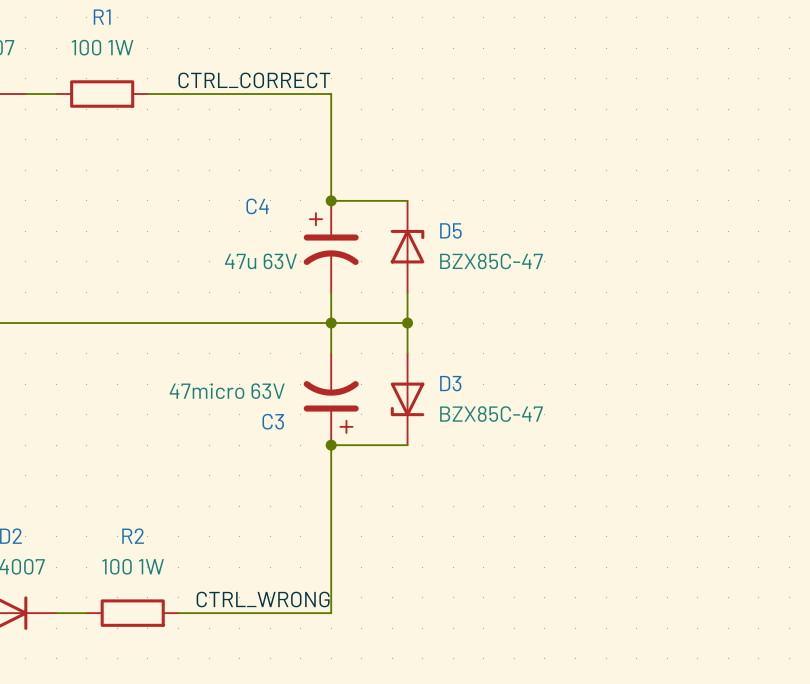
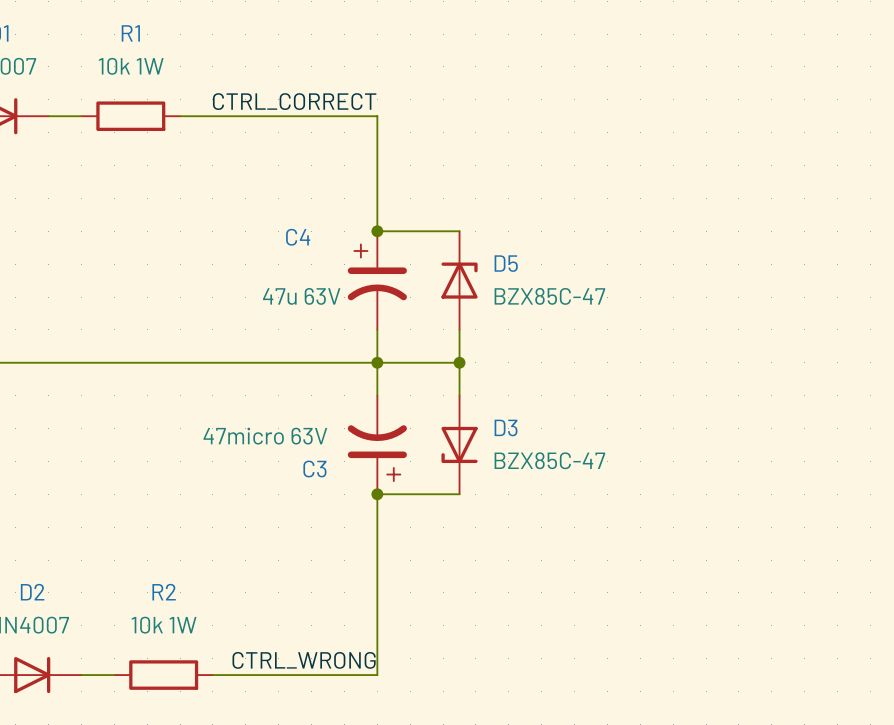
R1 value: 100 1W (102, 47) -> 10k 1W (131, 66)
R2 value: 100 1W (133, 566) -> 10k 1W (164, 625)

